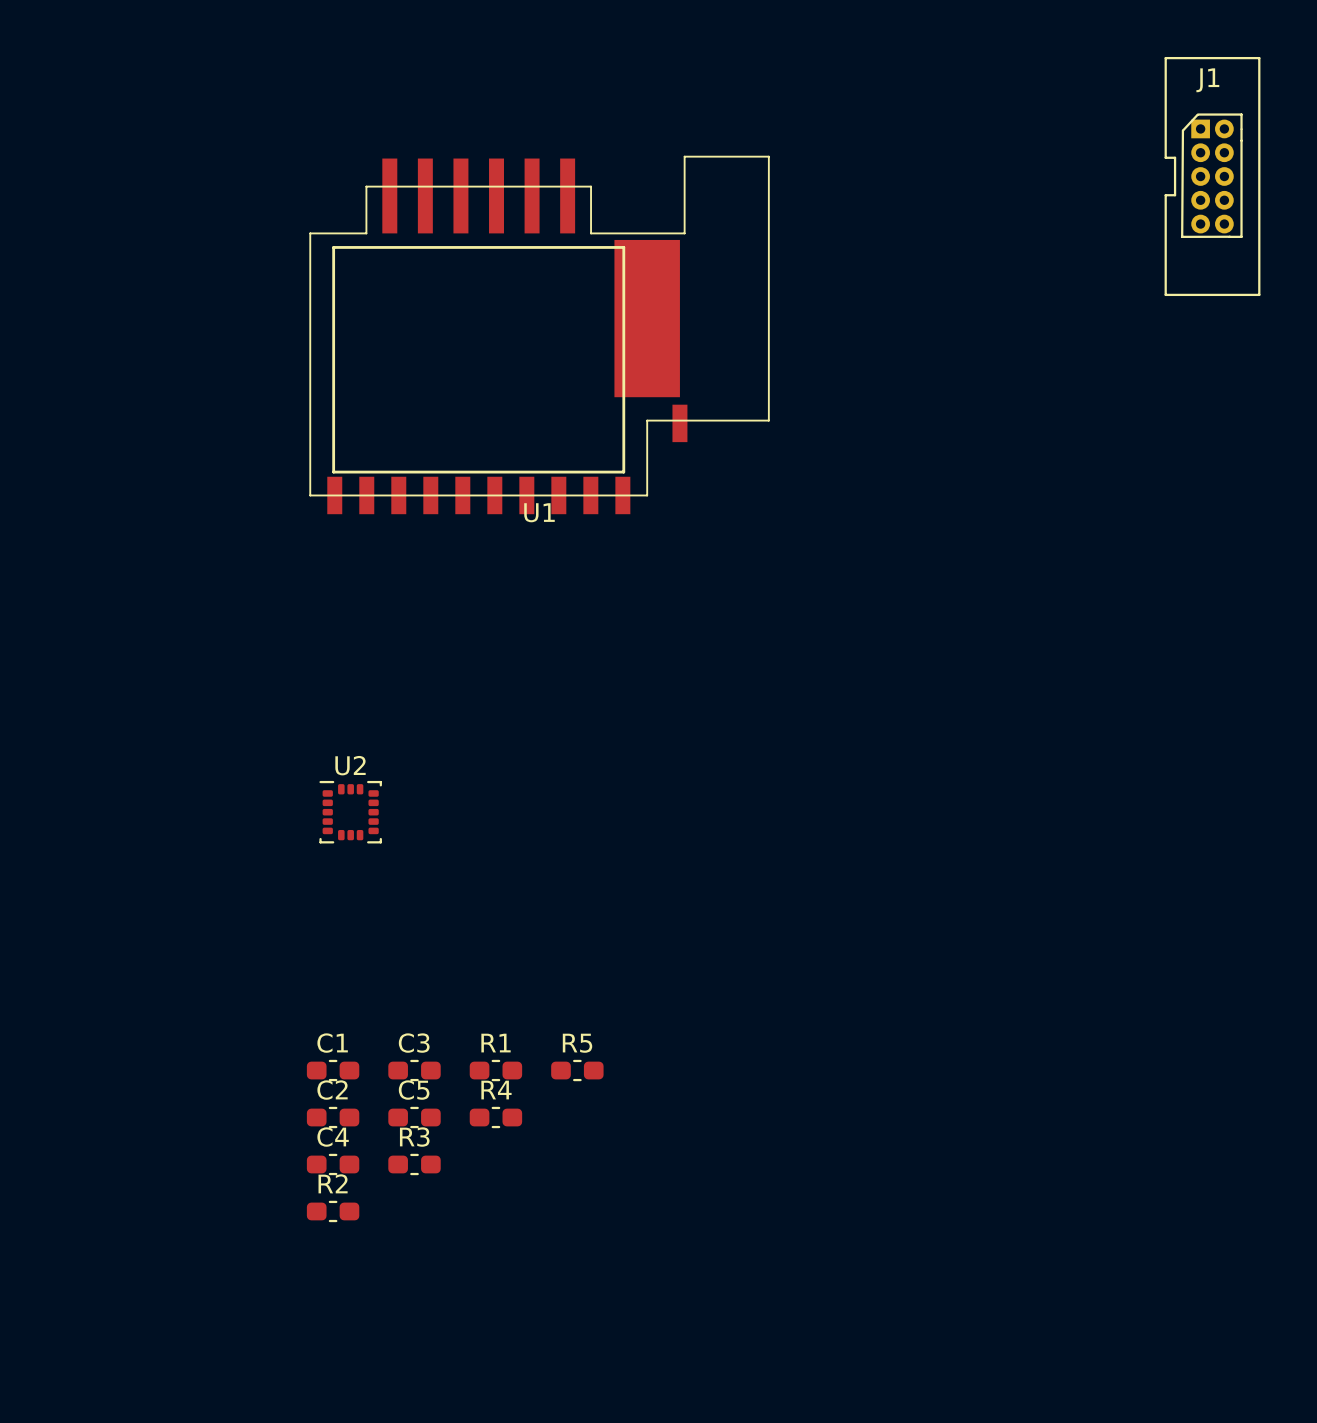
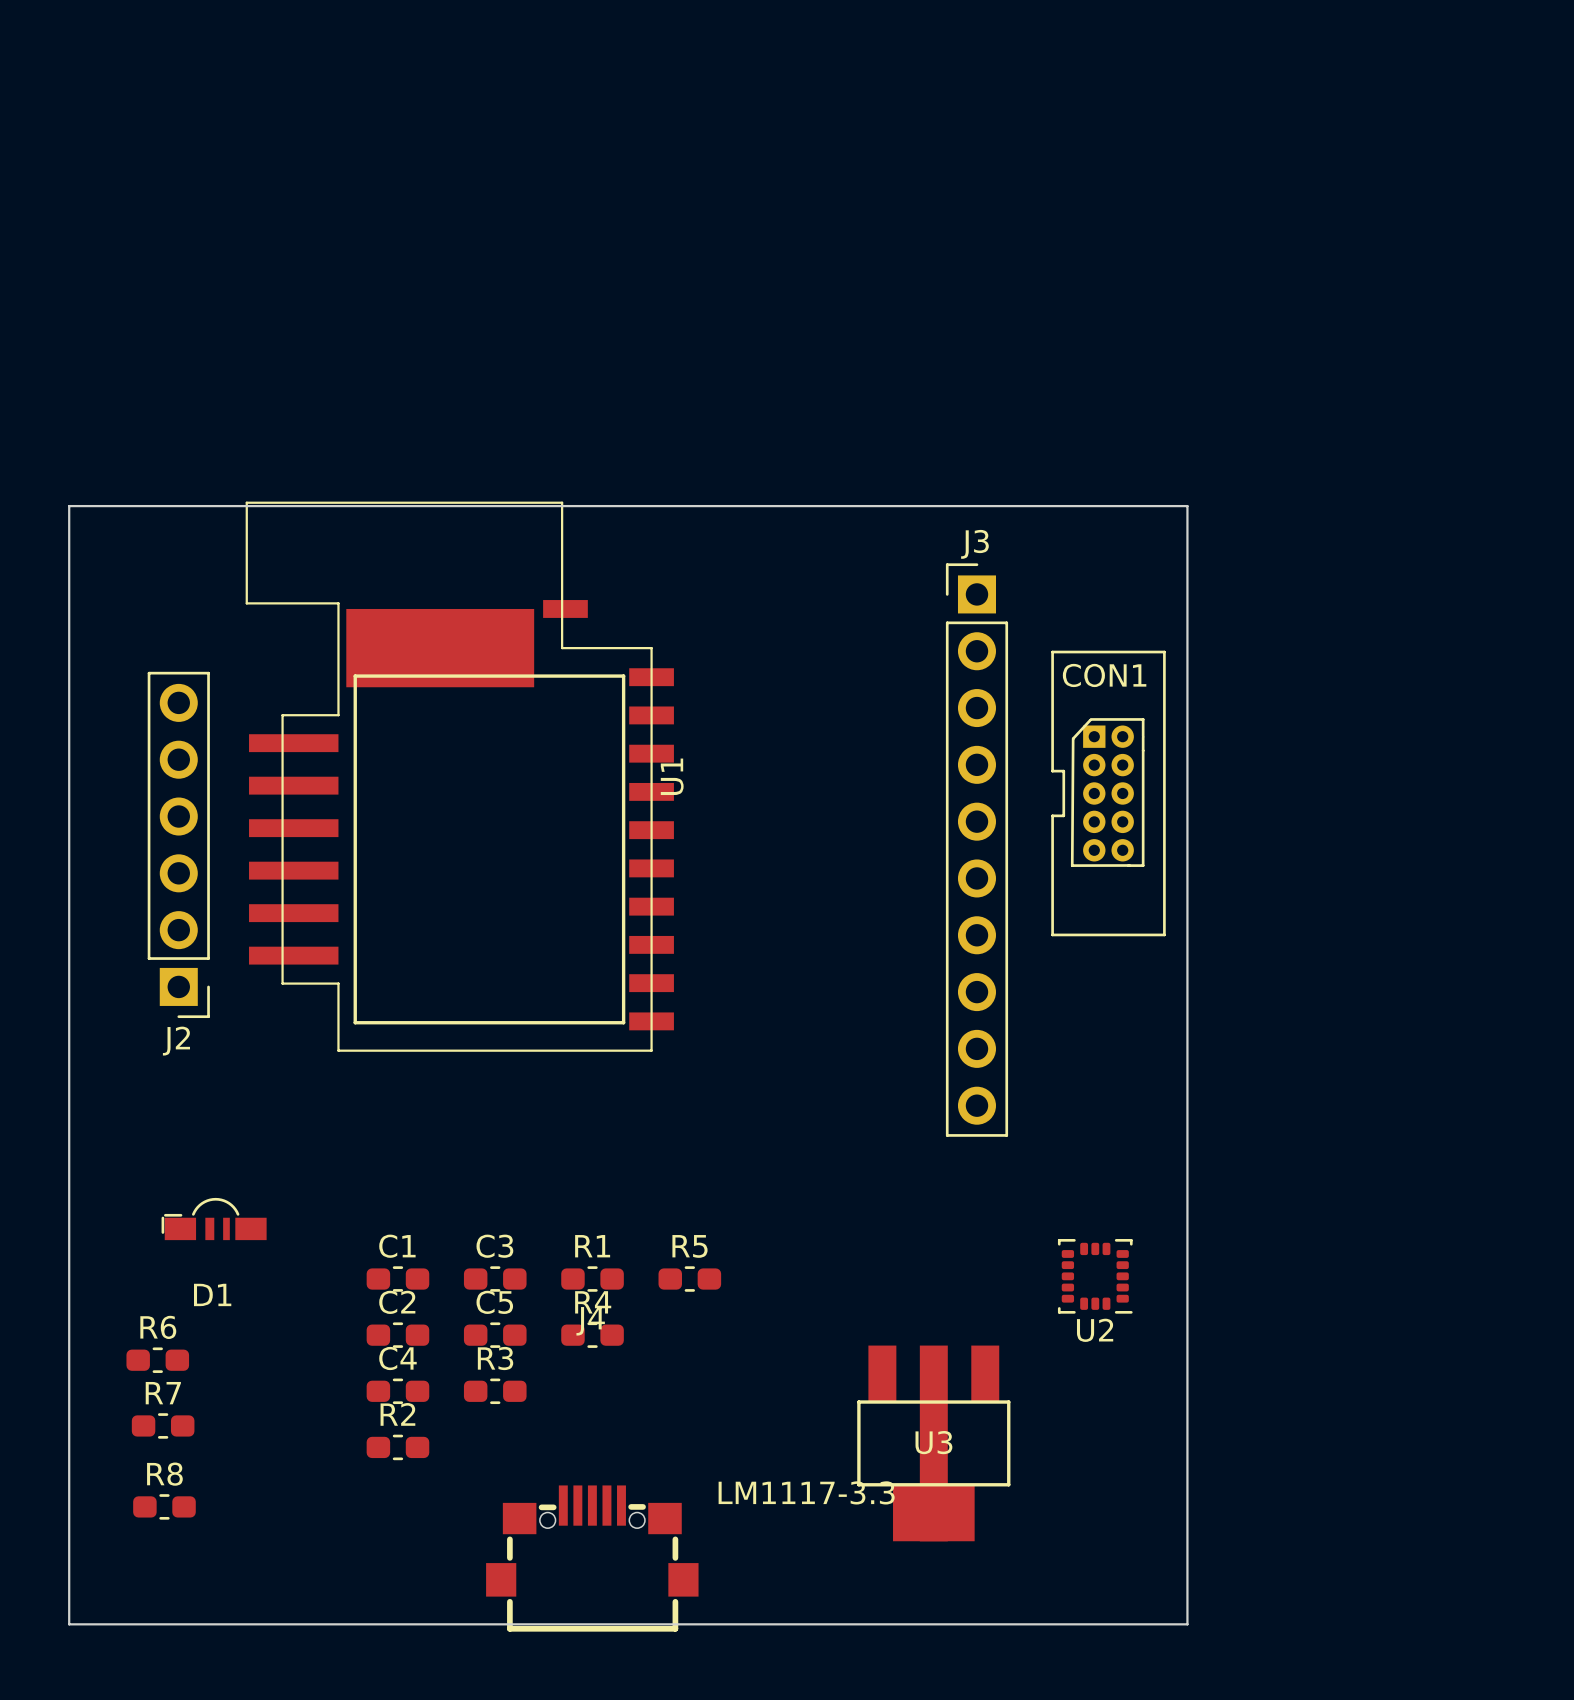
J1: (1212, 176) -> none
U1 rotation: 0° (539, 334) -> 90° counterclockwise (459, 776)
U1 position: (539, 334) -> (459, 776)
board edge: none -> (69, 506) (1187, 506) (1187, 1624) (69, 1624) (69, 506)
CON1: none -> (1108, 793)
J2: none -> (178, 844)
J3: none -> (976, 850)
U2 rotation: 0° (350, 812) -> 180° (1095, 1276)
U2 position: (350, 812) -> (1095, 1276)
D1: none -> (214, 1219)
R6: none -> (157, 1360)
R7: none -> (163, 1425)
U3: none -> LM1117-3.3 (933, 1443)
R8: none -> (164, 1506)
J4: none -> (592, 1558)

